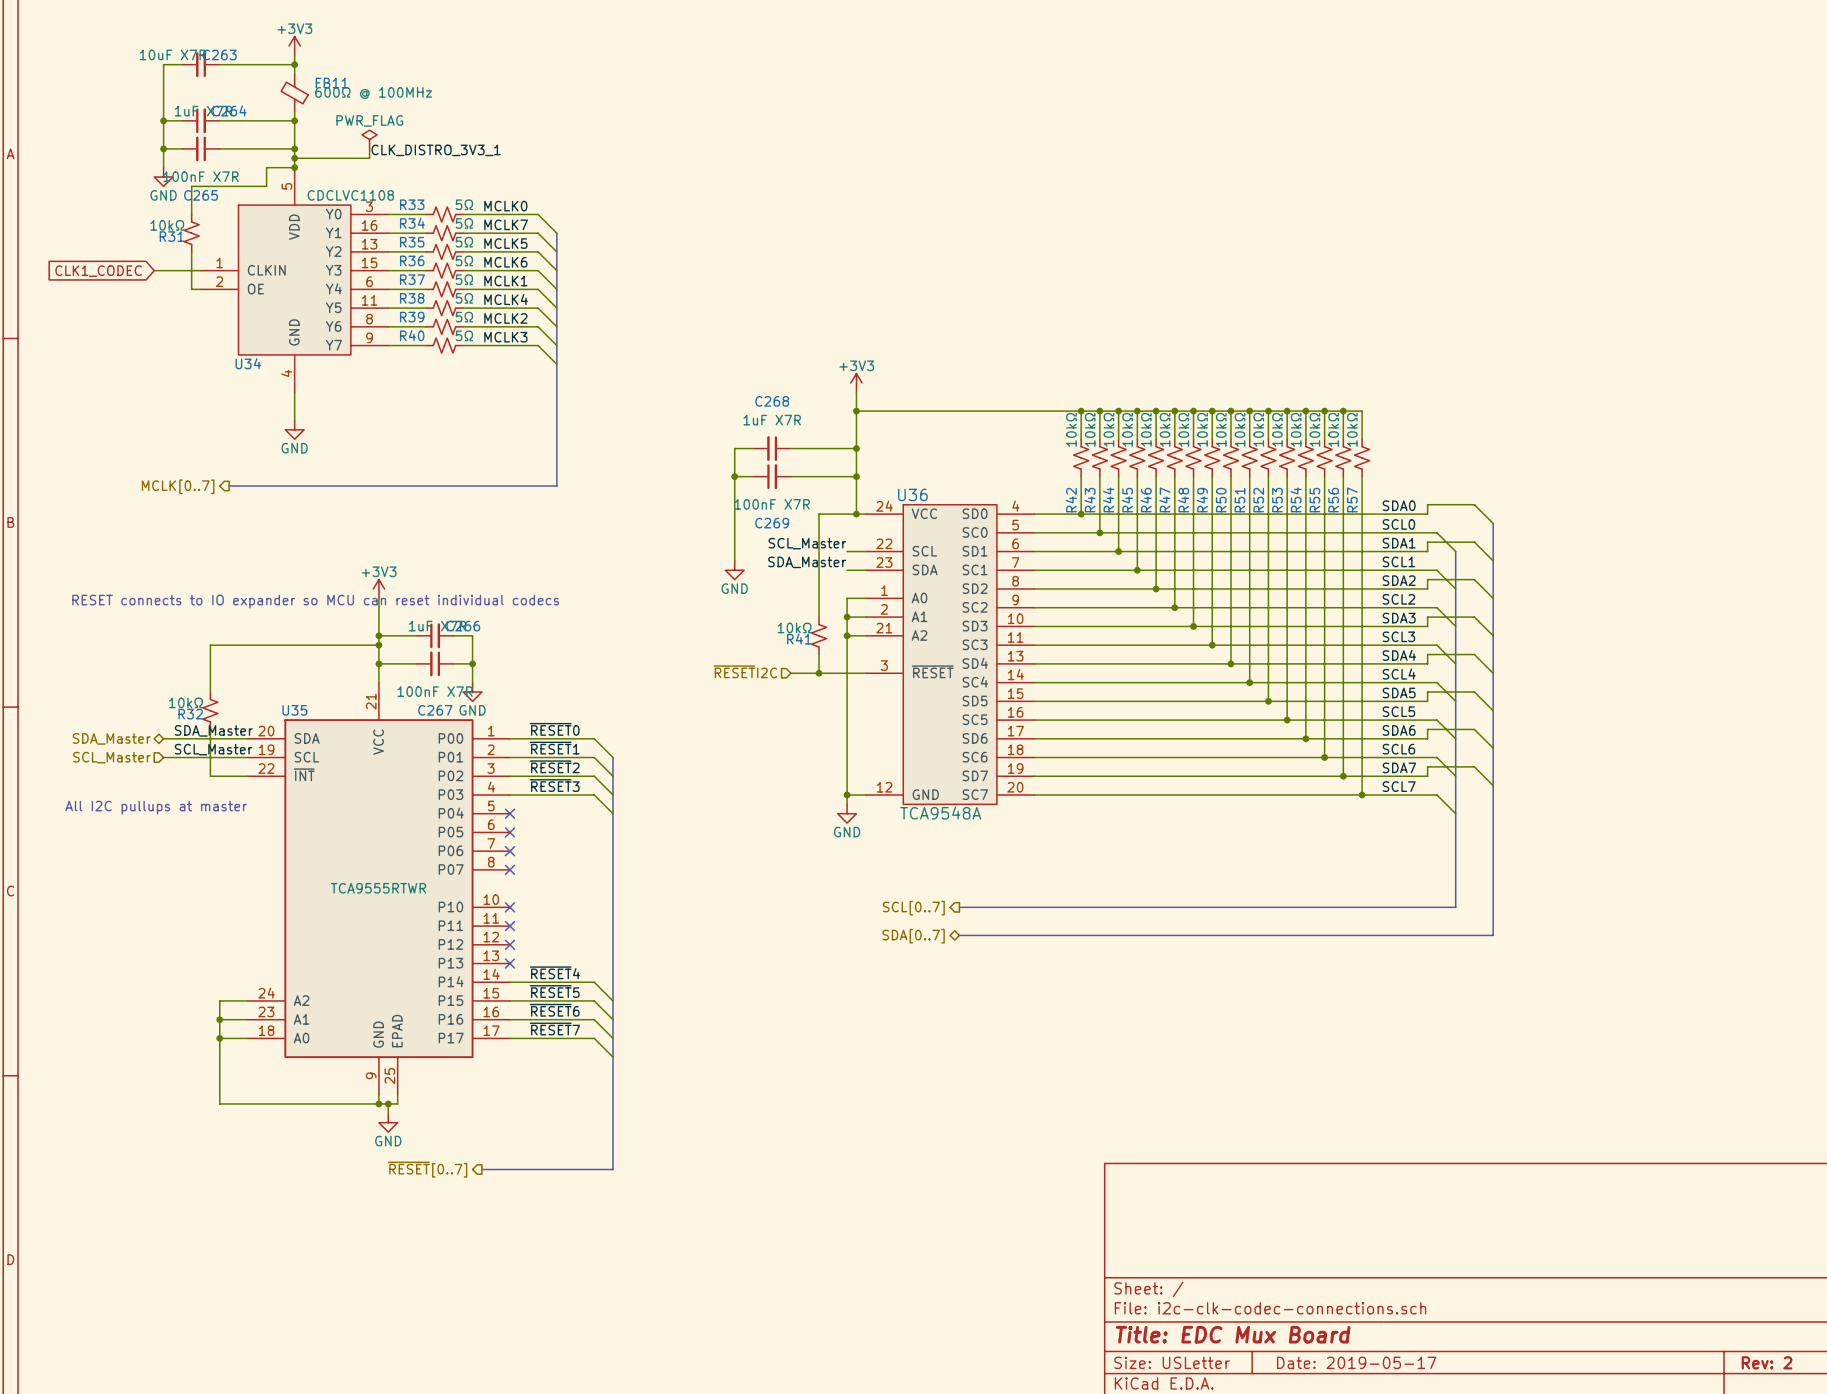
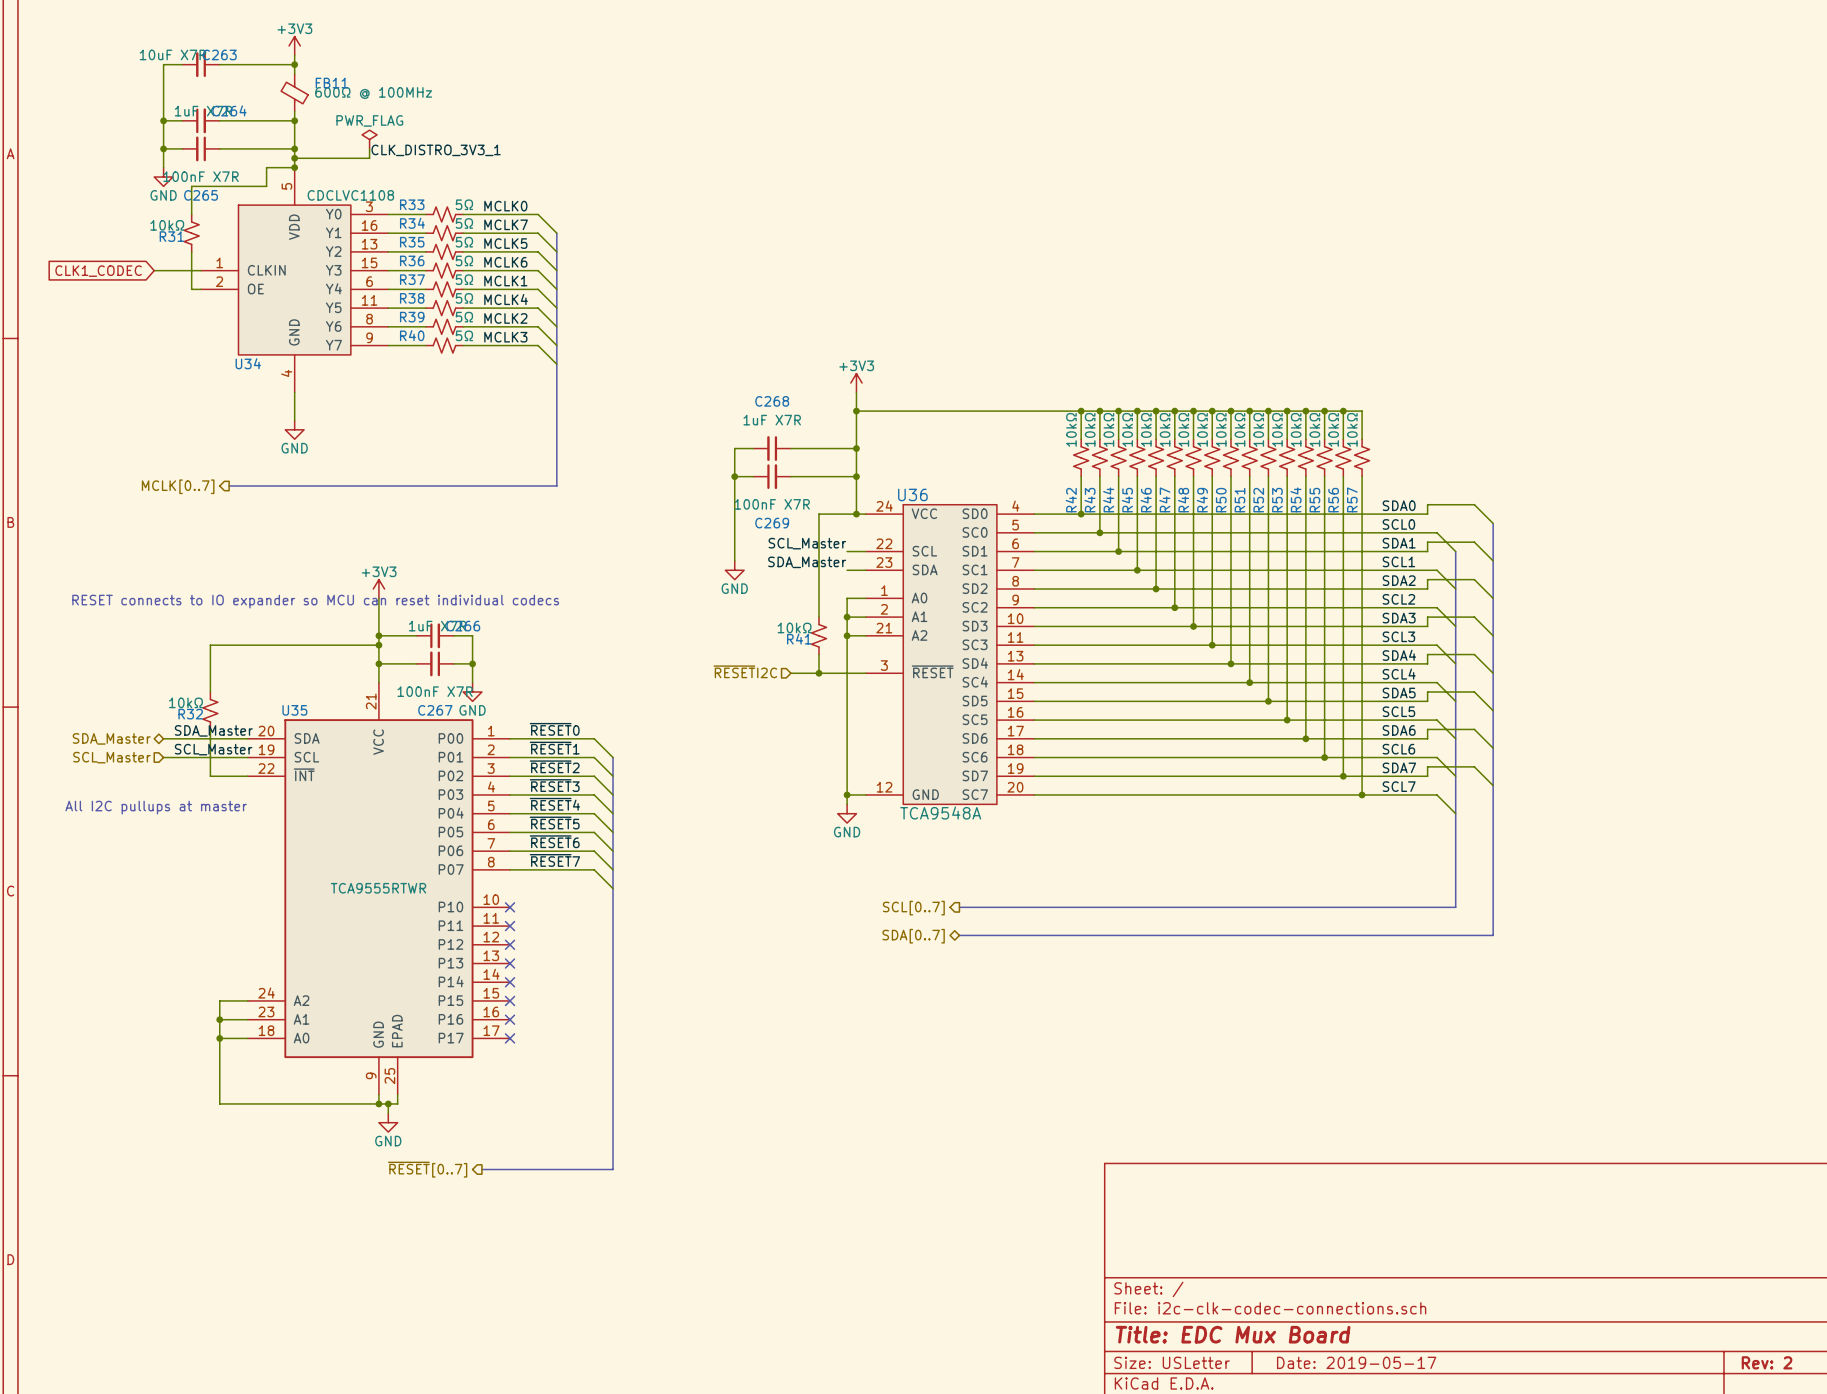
no-connect mark: (510, 813) -> none
no-connect mark: (510, 832) -> none
no-connect mark: (510, 851) -> none
no-connect mark: (510, 869) -> none
label position: ~{RESET}4 (554, 972) -> ~{RESET}4 (554, 804)
wire: (510, 982) (594, 982) (613, 1000) -> (510, 813) (594, 813) (613, 832)
no-connect mark: none -> (510, 982)
label position: ~{RESET}5 (554, 991) -> ~{RESET}5 (554, 823)
wire: (510, 1000) (594, 1000) (613, 1019) -> (510, 832) (594, 832) (613, 851)
no-connect mark: none -> (510, 1000)
label position: ~{RESET}6 (554, 1010) -> ~{RESET}6 (554, 841)
wire: (510, 1019) (594, 1019) (613, 1038) -> (510, 851) (594, 851) (613, 869)
no-connect mark: none -> (510, 1019)
label position: ~{RESET}7 (554, 1028) -> ~{RESET}7 (554, 860)
wire: (510, 1038) (594, 1038) (613, 1057) -> (510, 869) (594, 869) (613, 888)
no-connect mark: none -> (510, 1038)

